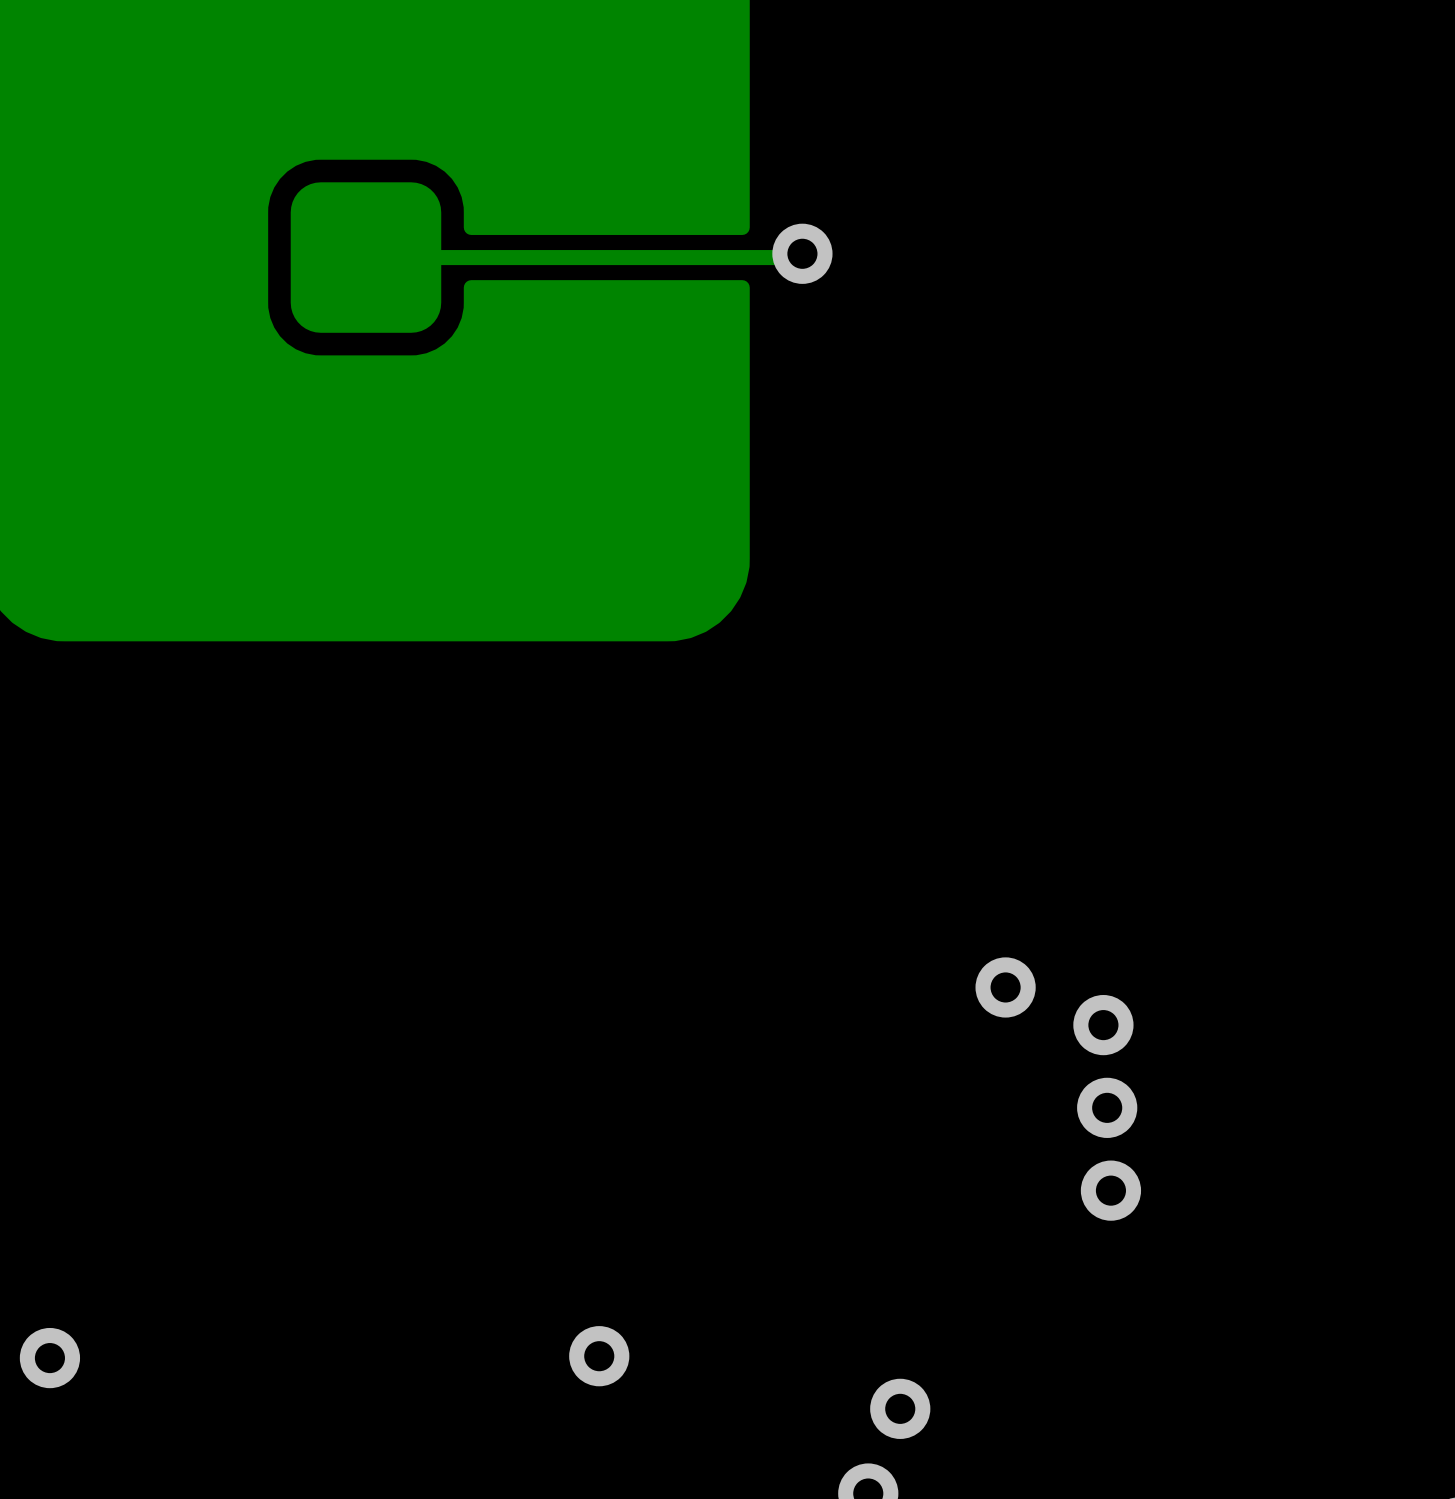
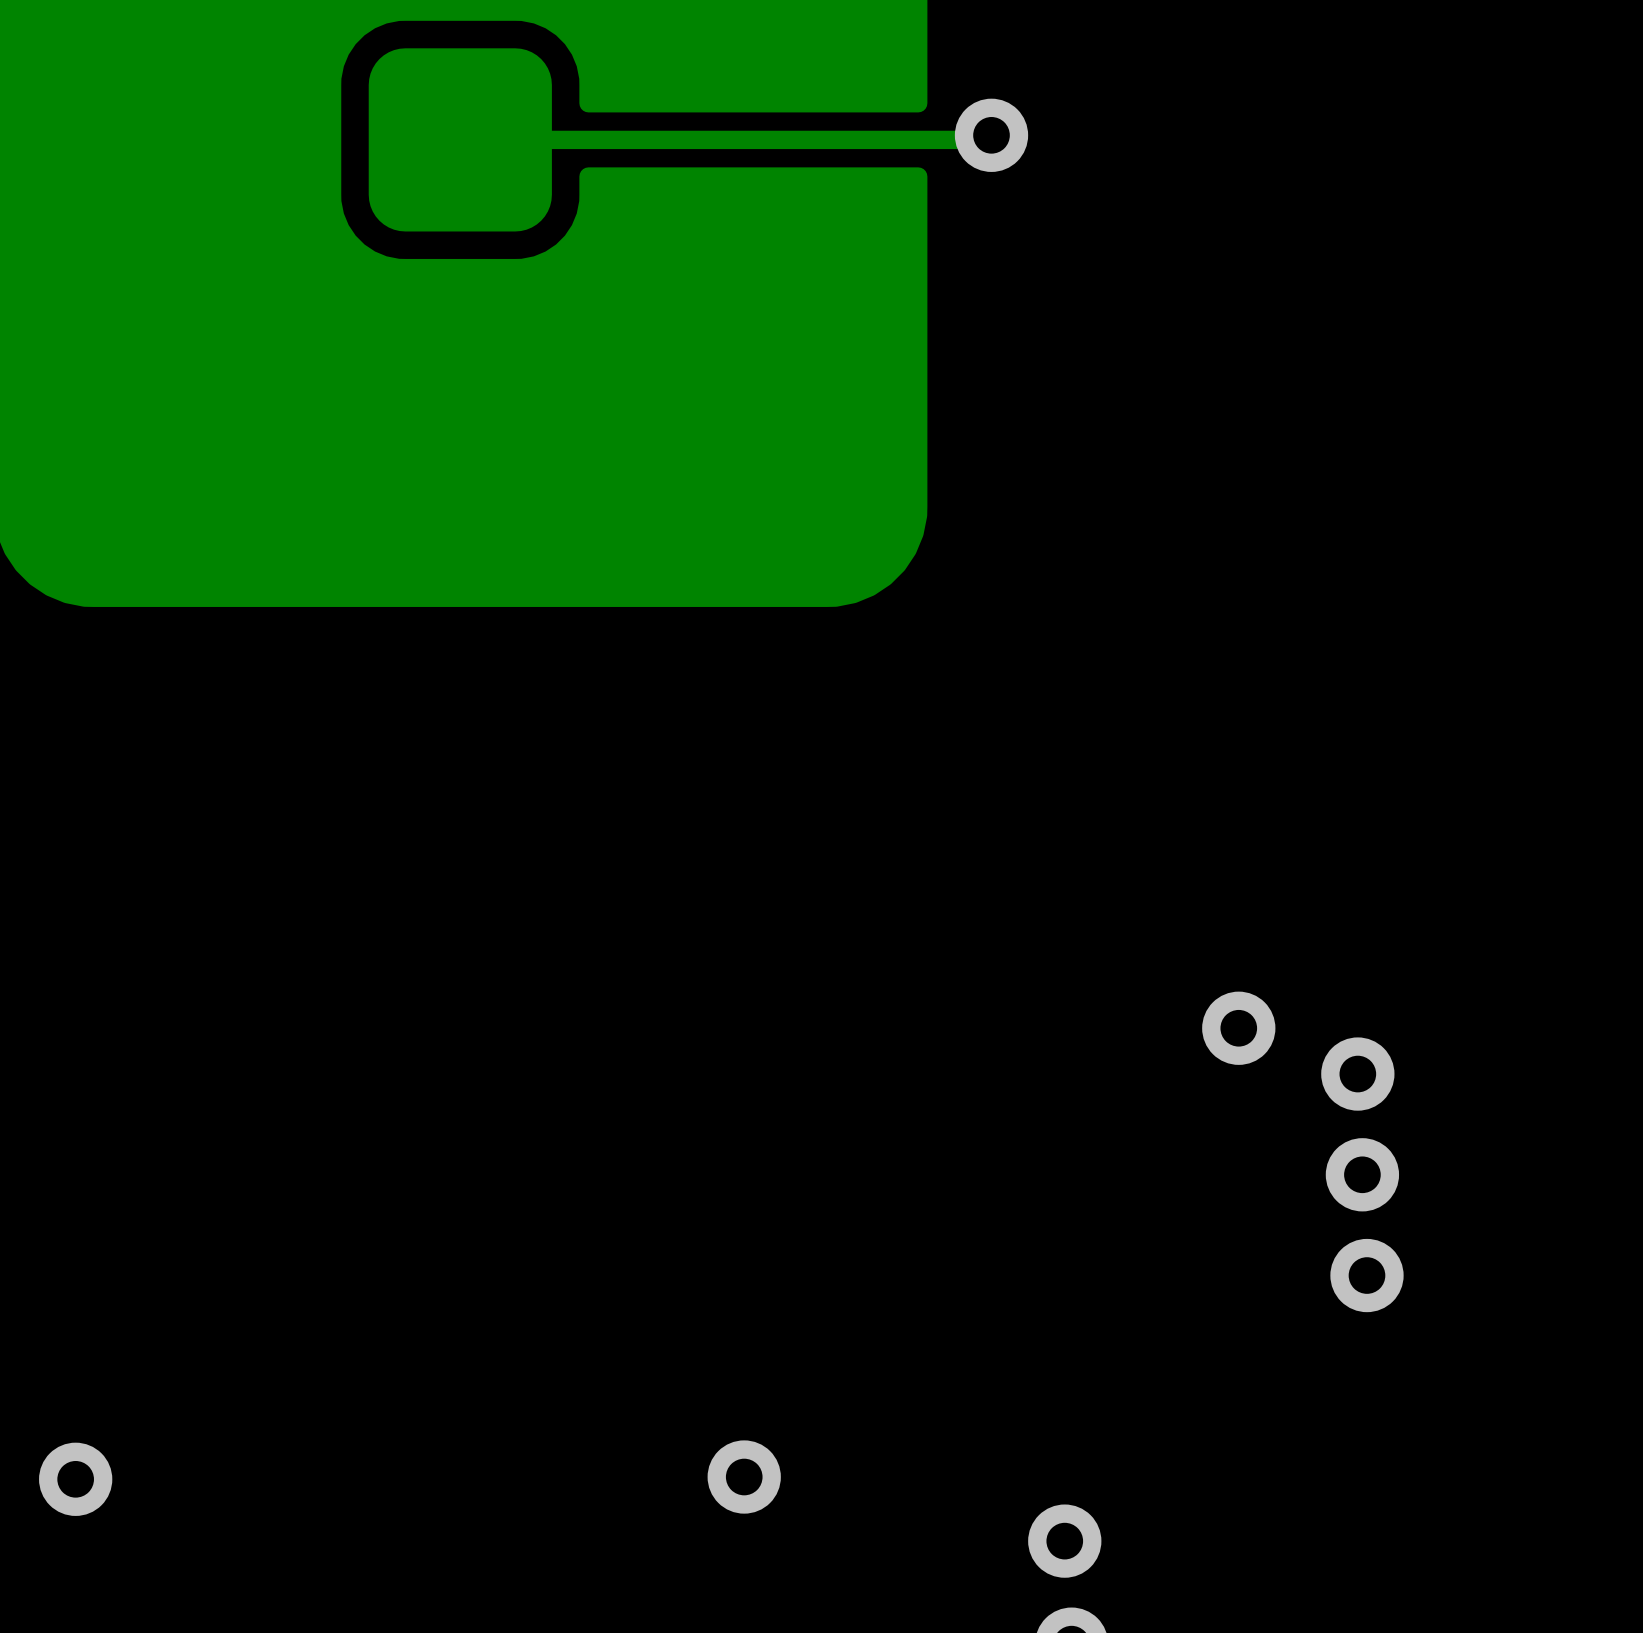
via position: (900, 1408) -> (1064, 1541)

